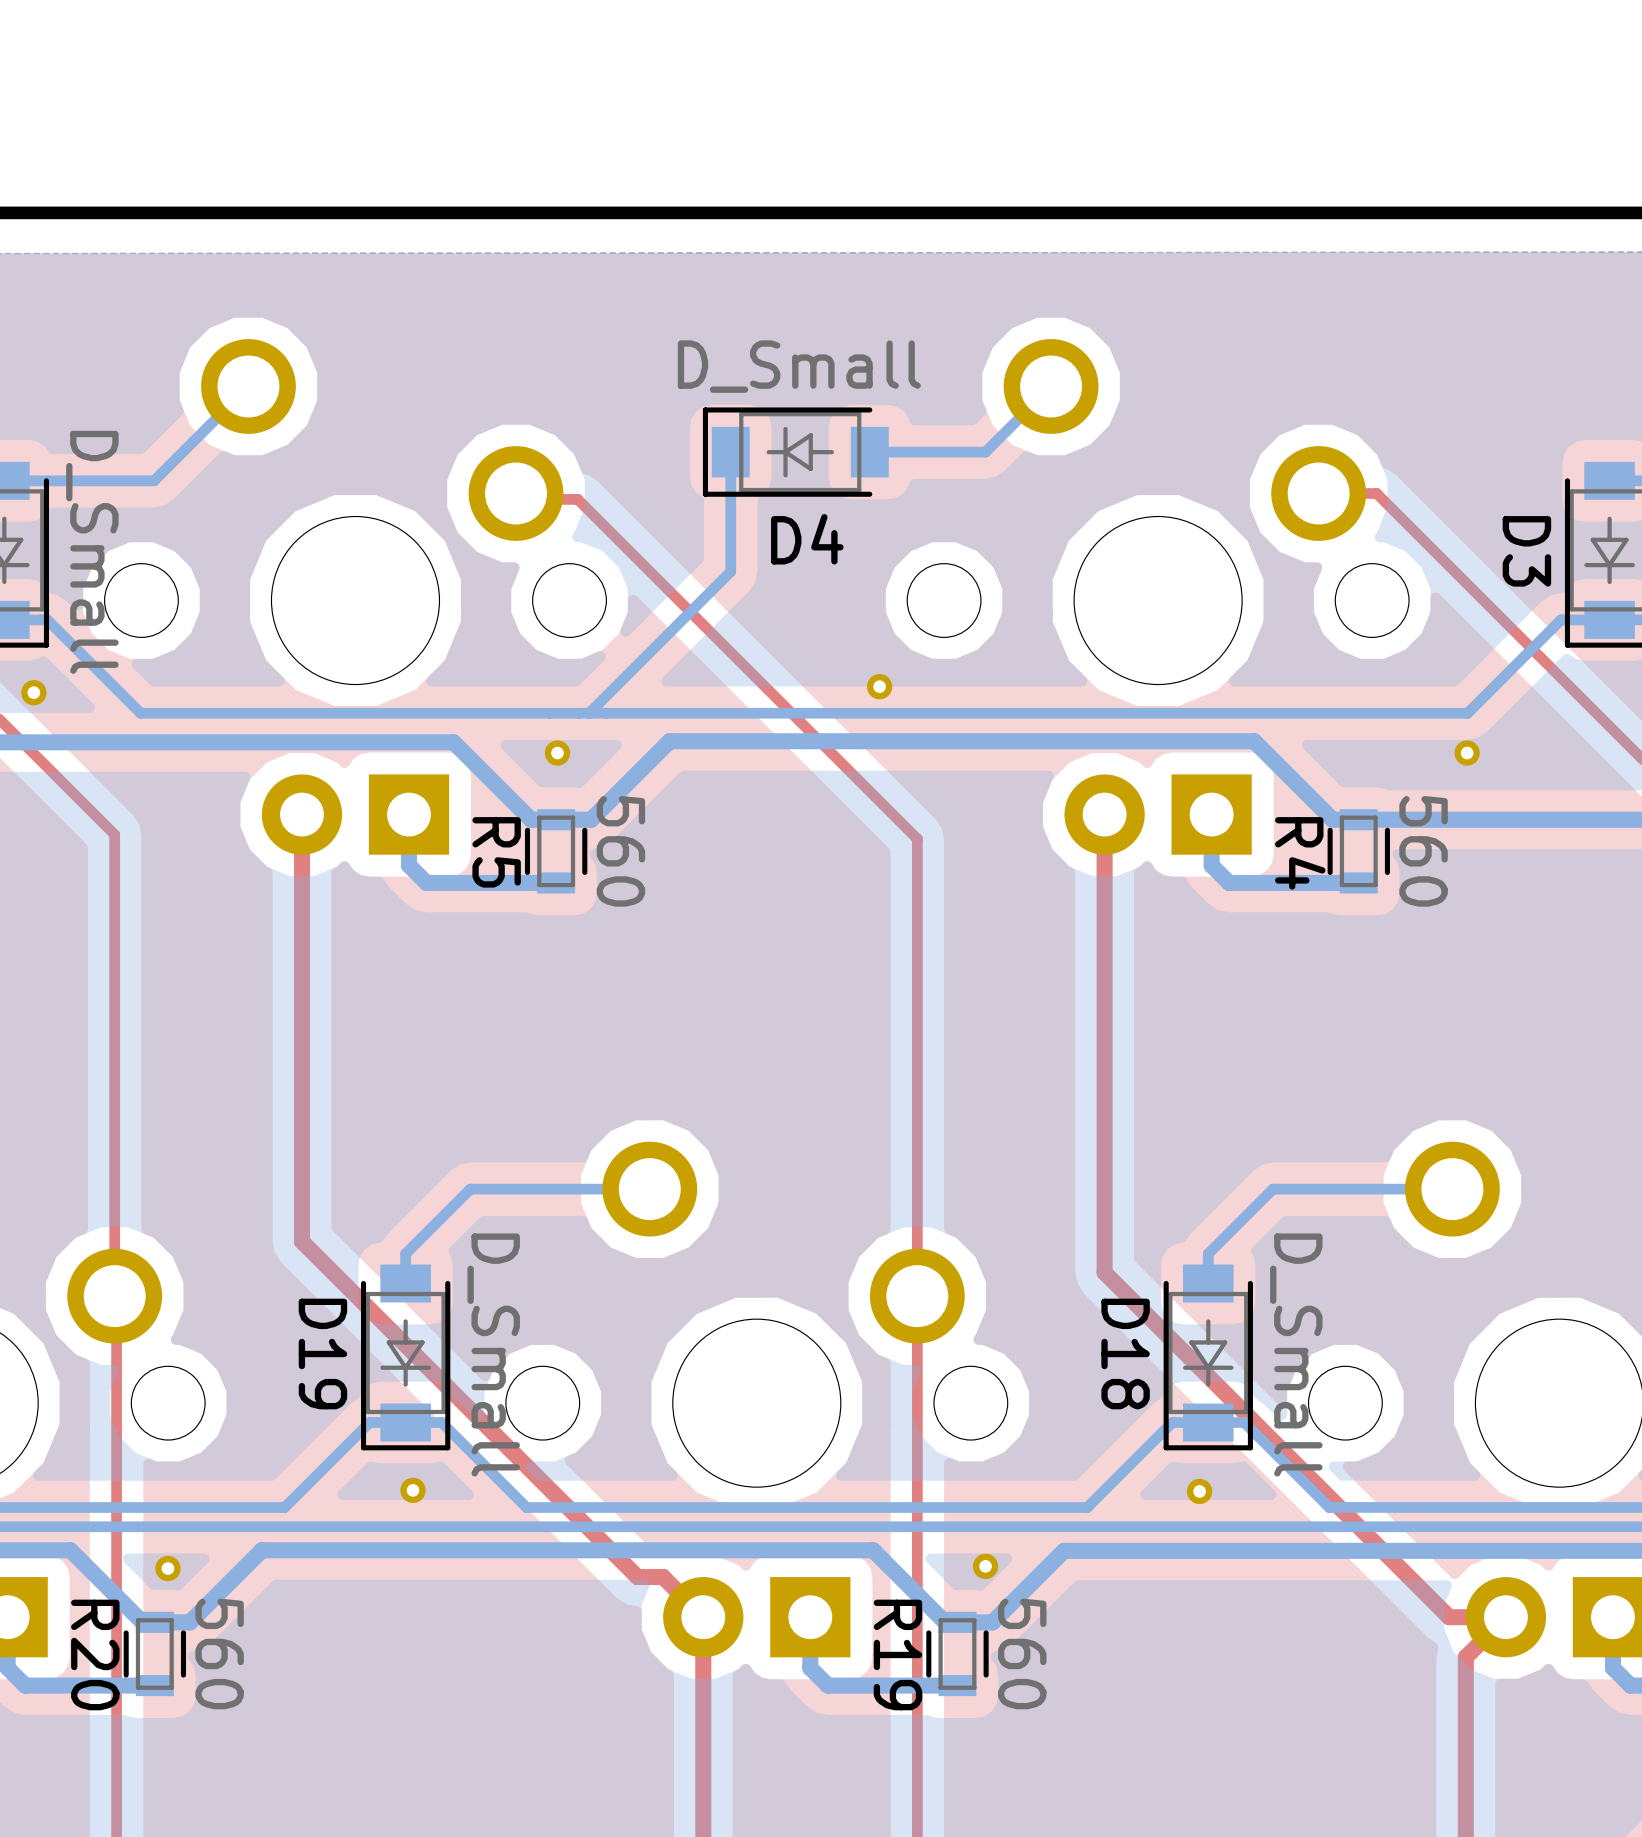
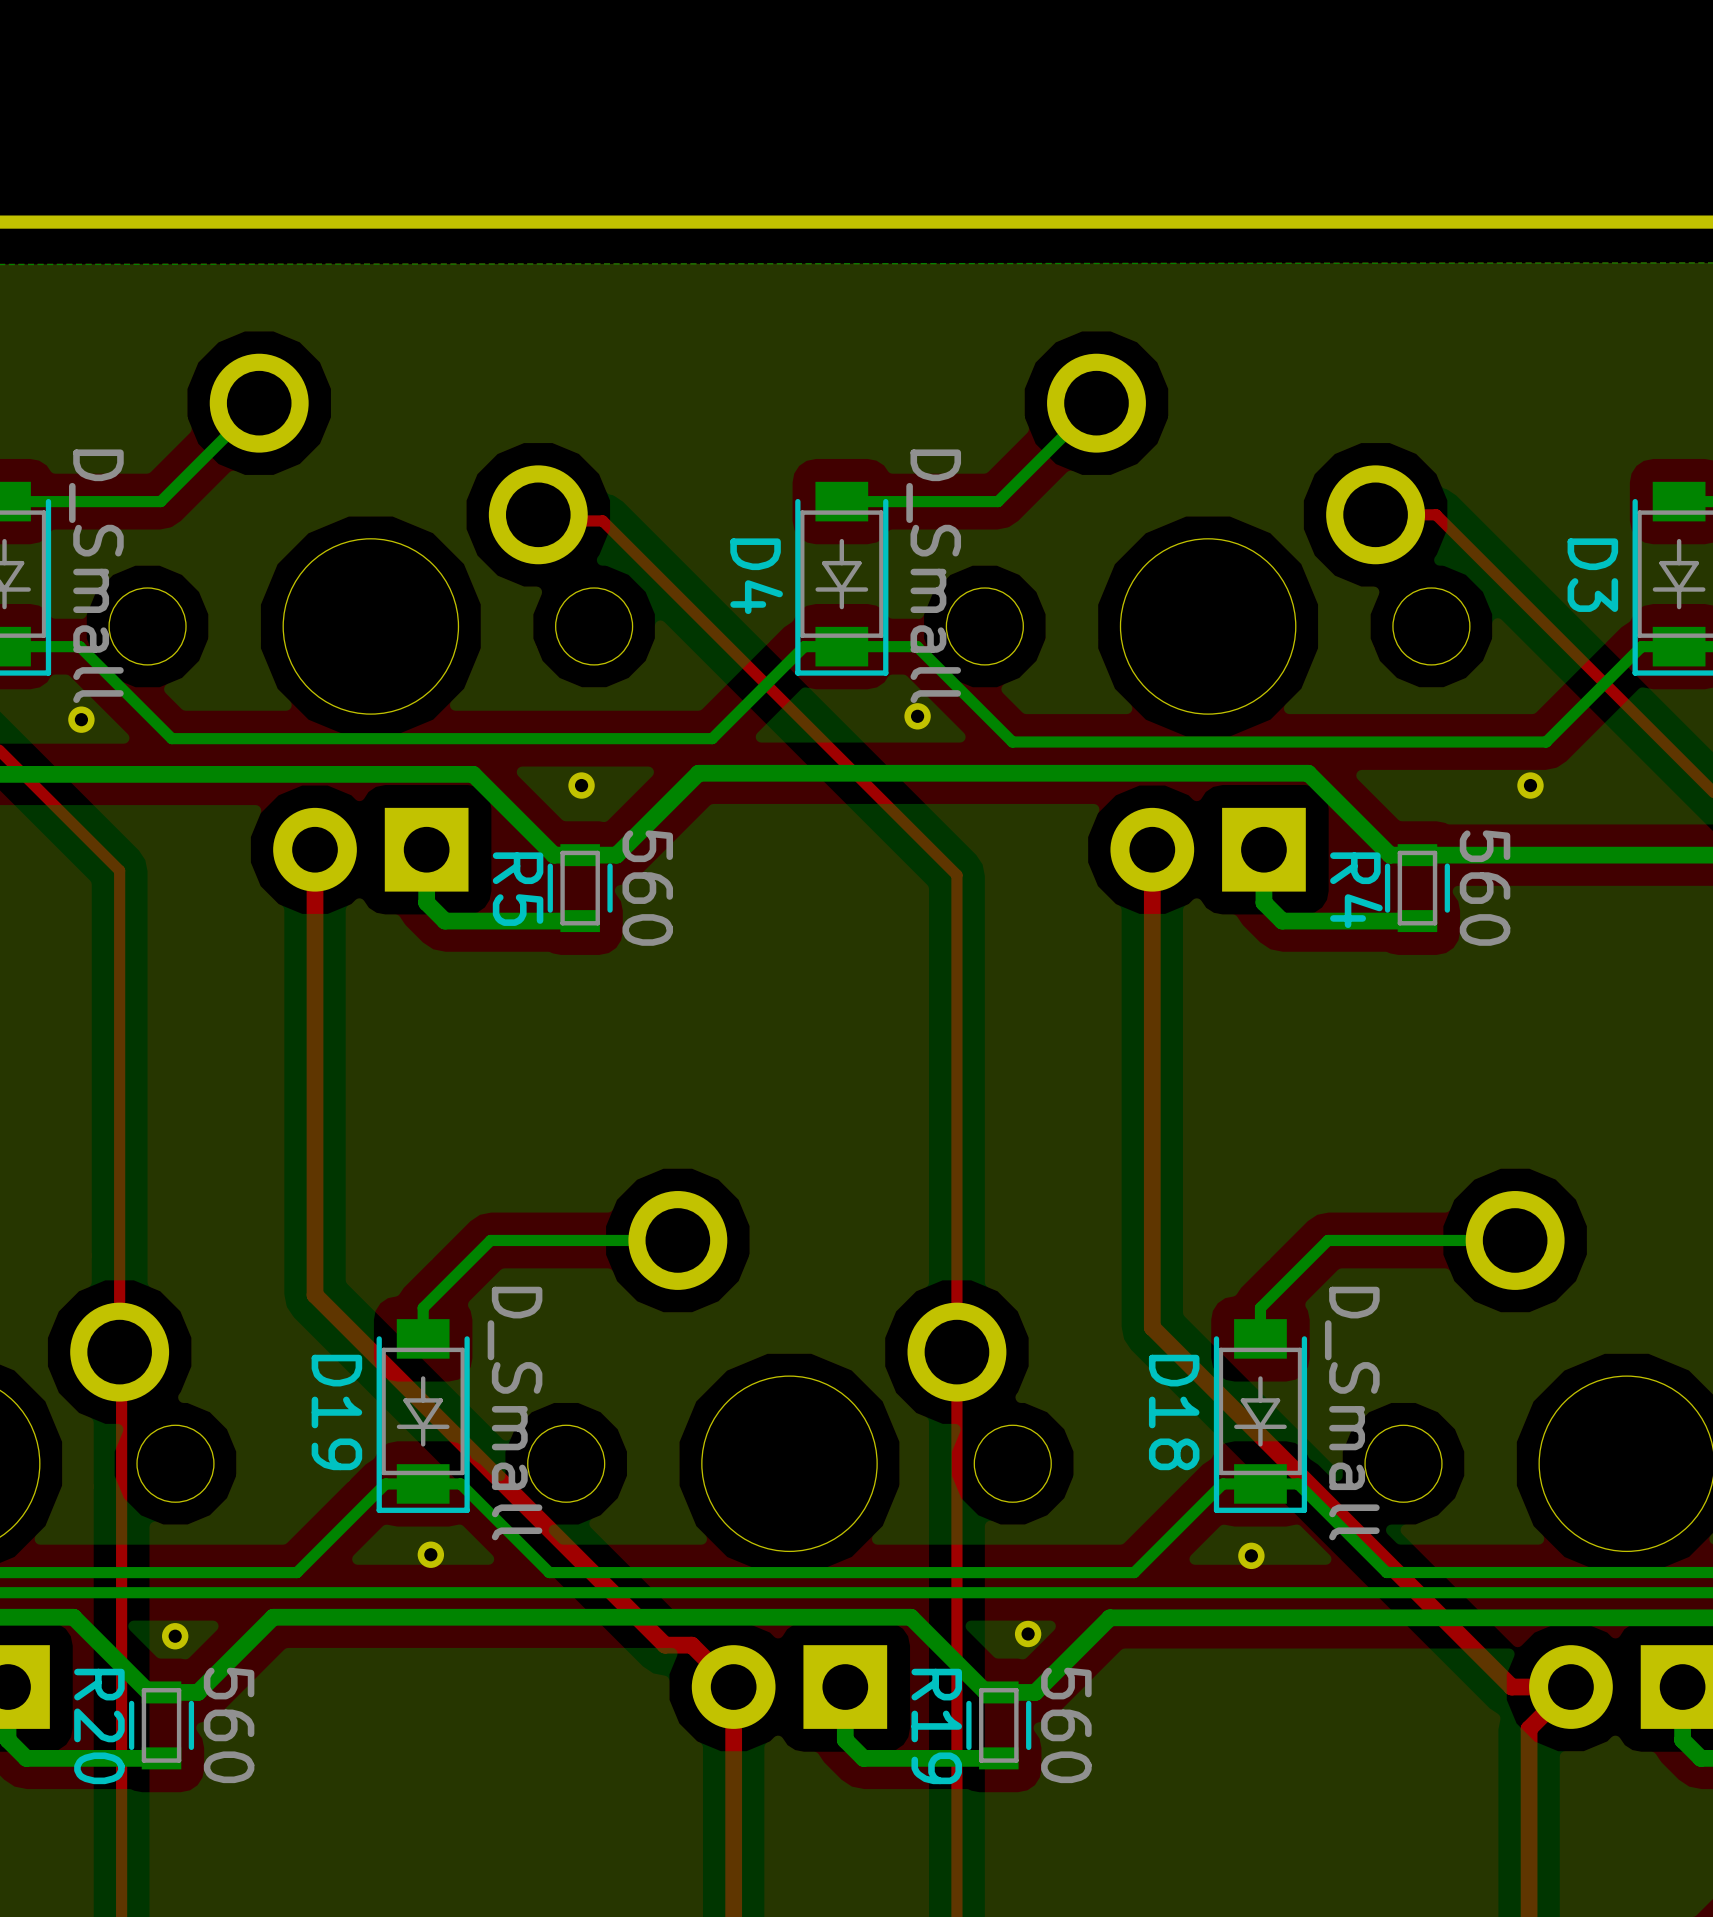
D4 value position: D_Small (799, 366) -> D_Small (933, 576)
bottom track: (730, 452) (730, 571) (589, 713) -> none
D4 rotation: 0° (795, 452) -> 90° counterclockwise (841, 578)
bottom track: (985, 452) (869, 452) -> (1028, 471) (998, 501) (841, 501)
D4 name position: D4 (807, 539) -> D4 (756, 576)
bottom track: (1573, 619) (1560, 619) (1467, 713) (140, 713) (47, 619) -> (1641, 646) (1546, 742) (1012, 742) (917, 646) (804, 646) (712, 738) (171, 738) (79, 646) (49, 646)
part position: (33, 692) -> (81, 719)

